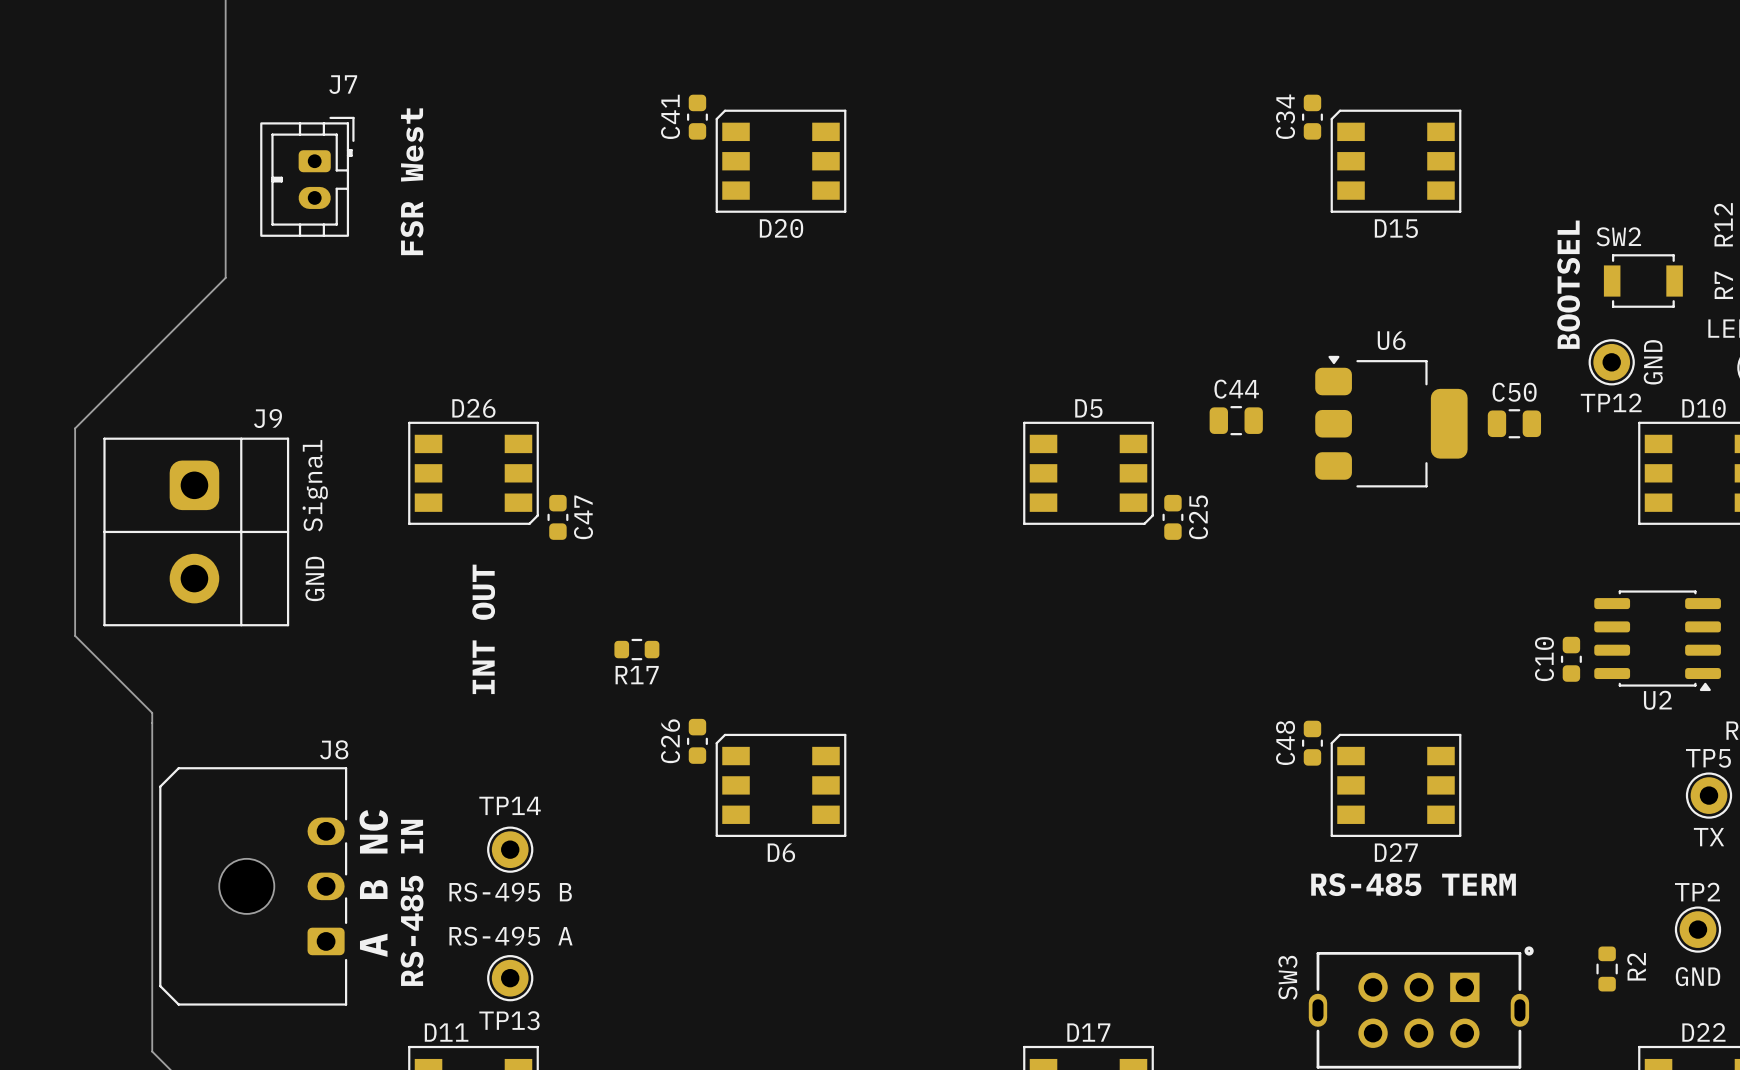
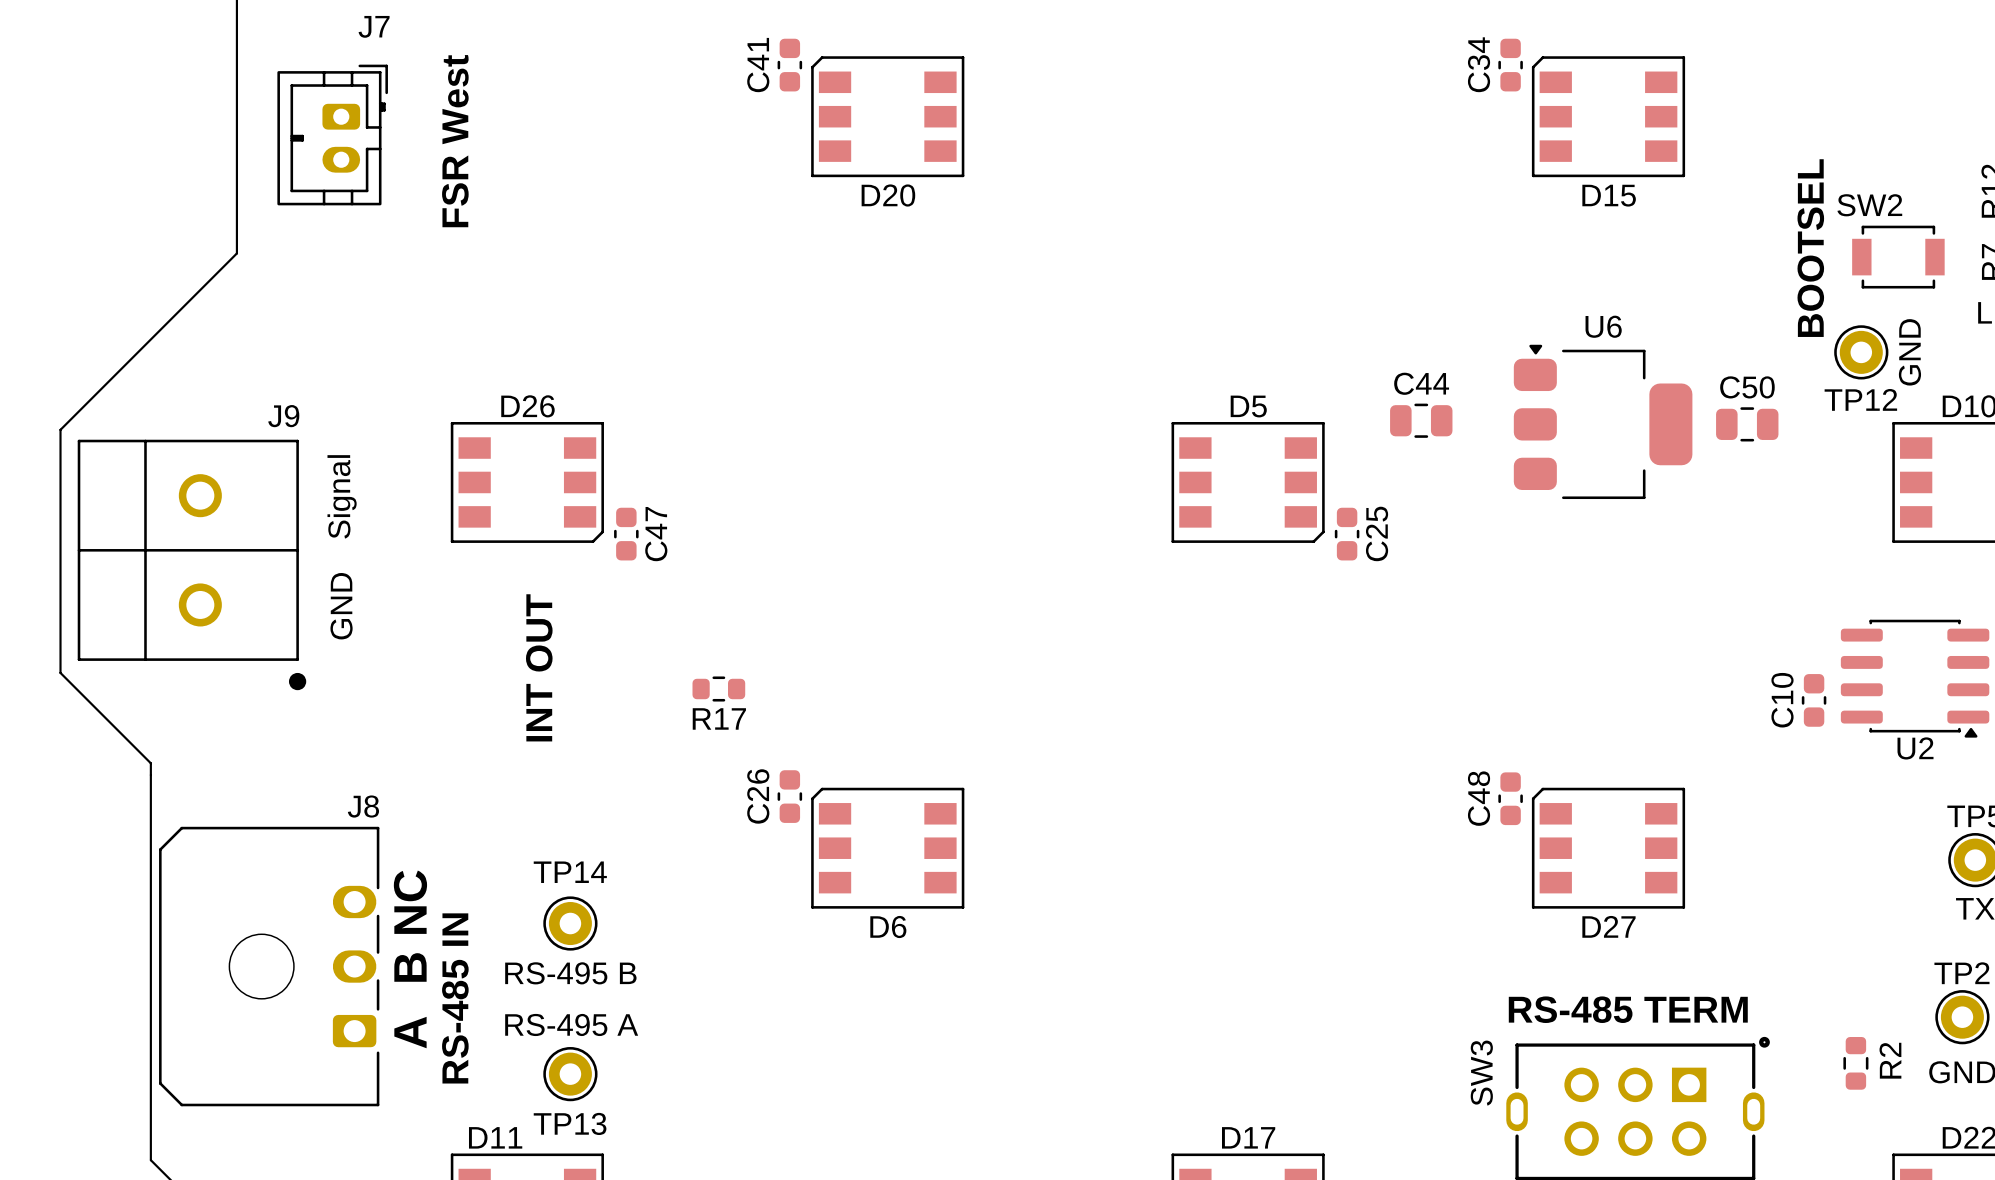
J9 footprint: [103, 437, 290, 627] -> [77, 439, 307, 691]
text position: RS-485 TERM (1413, 884) -> RS-485 TERM (1628, 1009)

